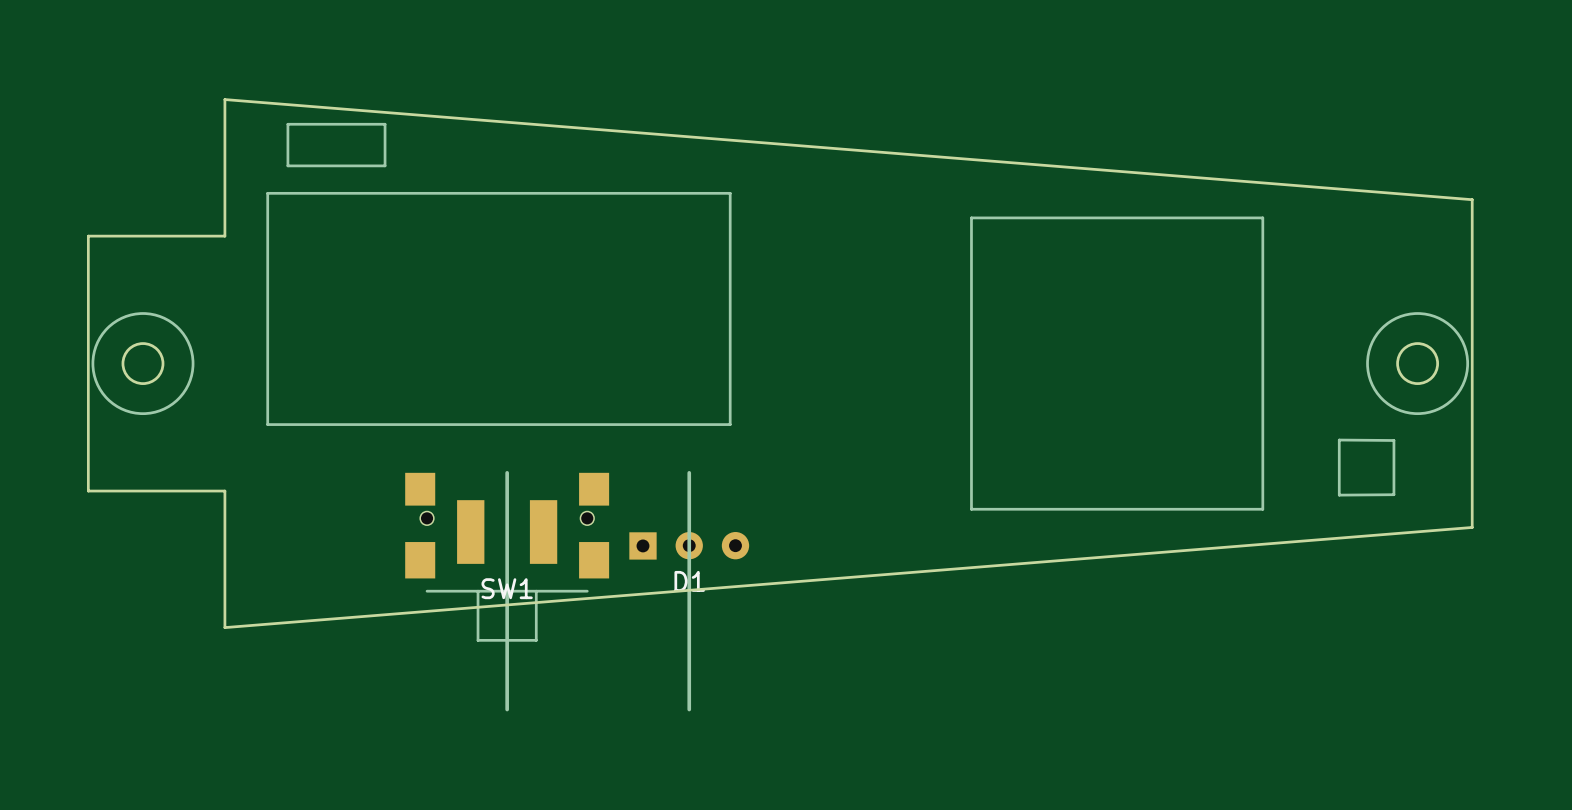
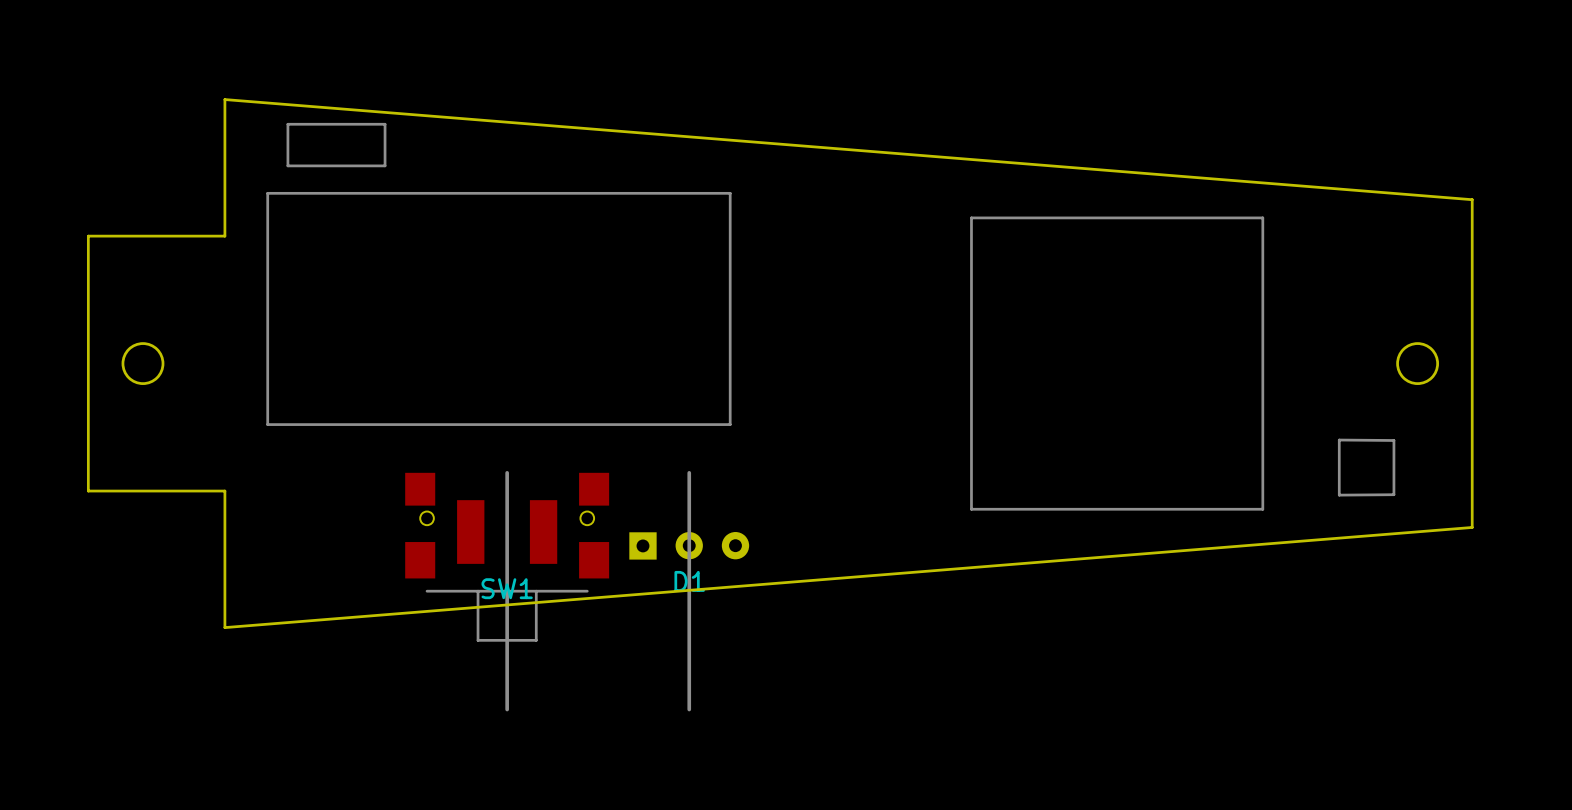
drawing: [91, 312, 195, 416] -> none
drawing: [1366, 312, 1470, 416] -> none

